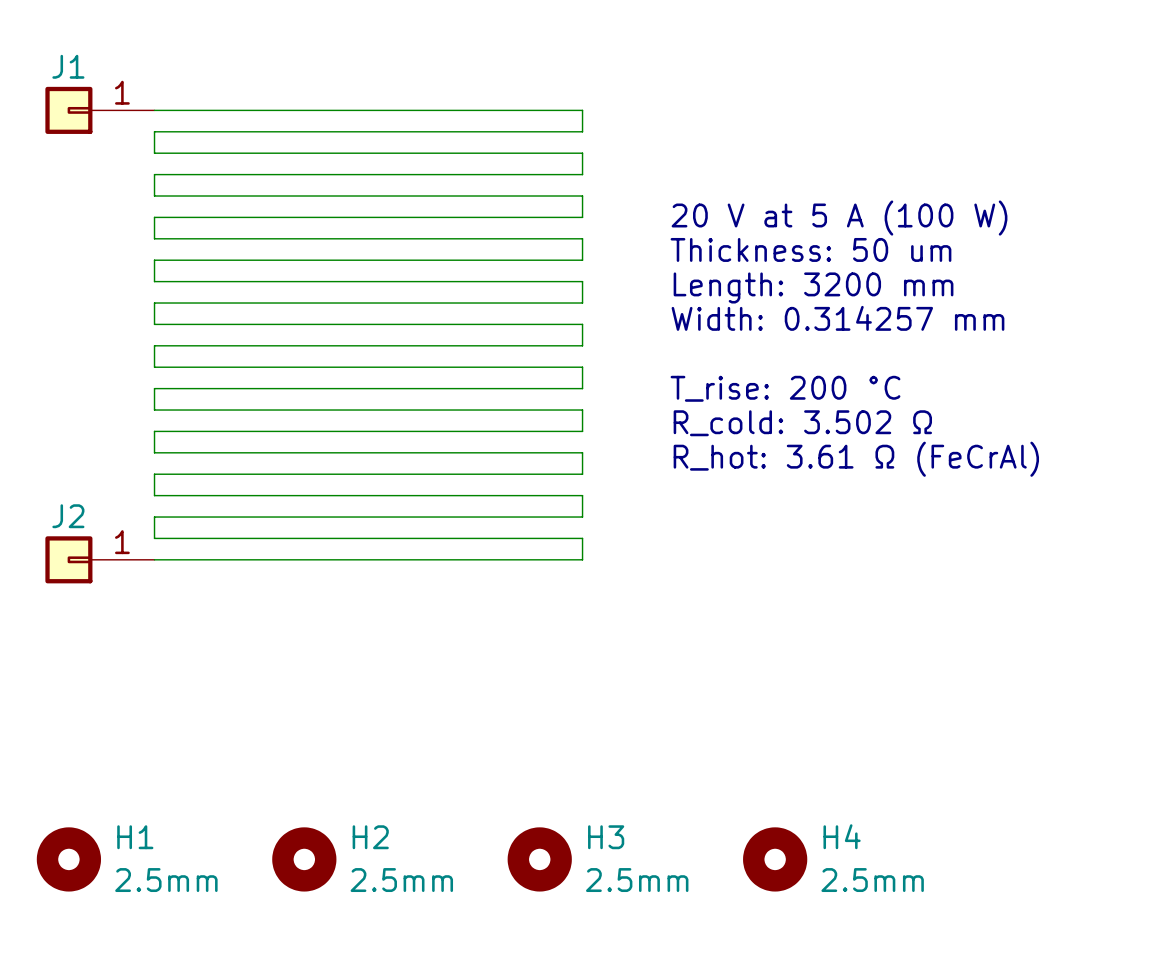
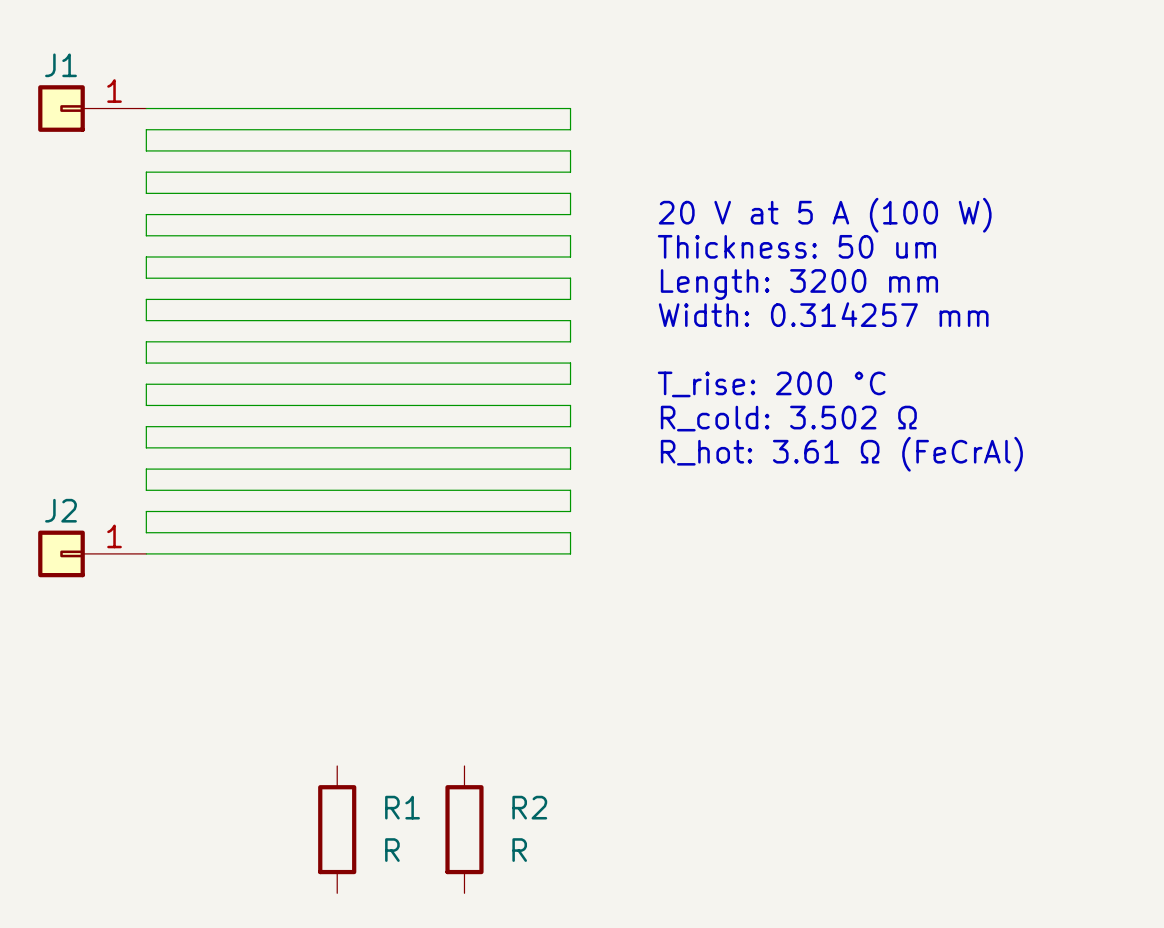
R1: none -> R (337, 829)
R2: none -> R (464, 829)
H1: 2.5mm (68, 859) -> none
H2: 2.5mm (304, 859) -> none
H3: 2.5mm (539, 859) -> none
H4: 2.5mm (775, 859) -> none

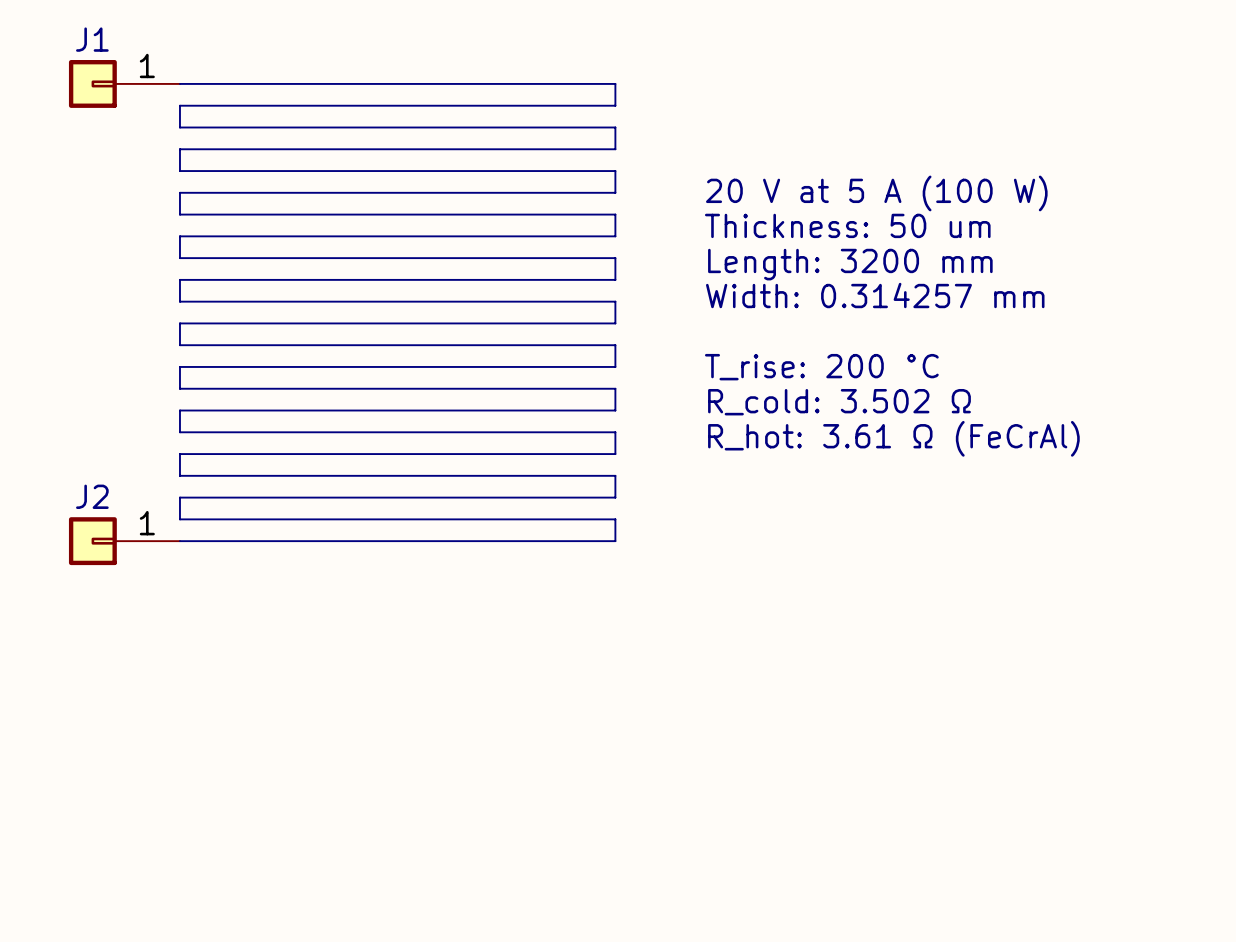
R1: R (337, 829) -> none
R2: R (464, 829) -> none

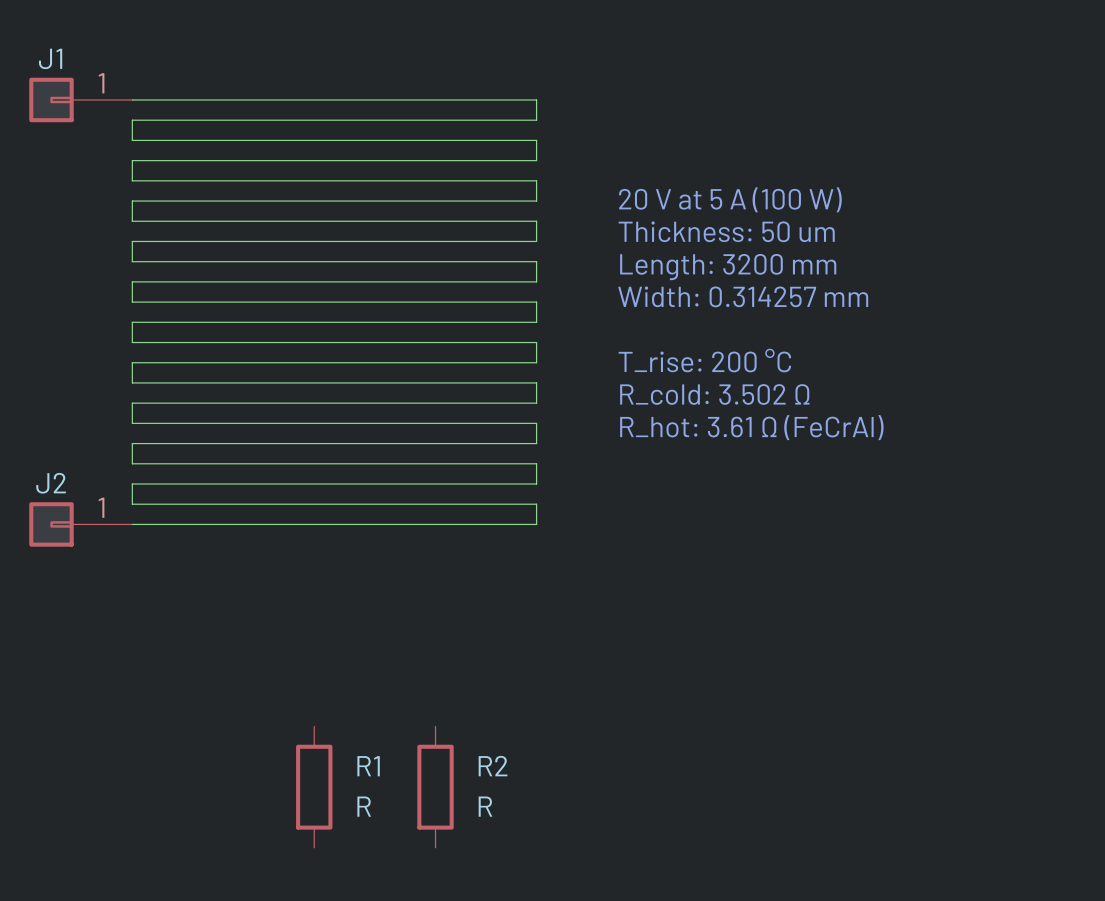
R1: none -> R (314, 787)
R2: none -> R (435, 787)

